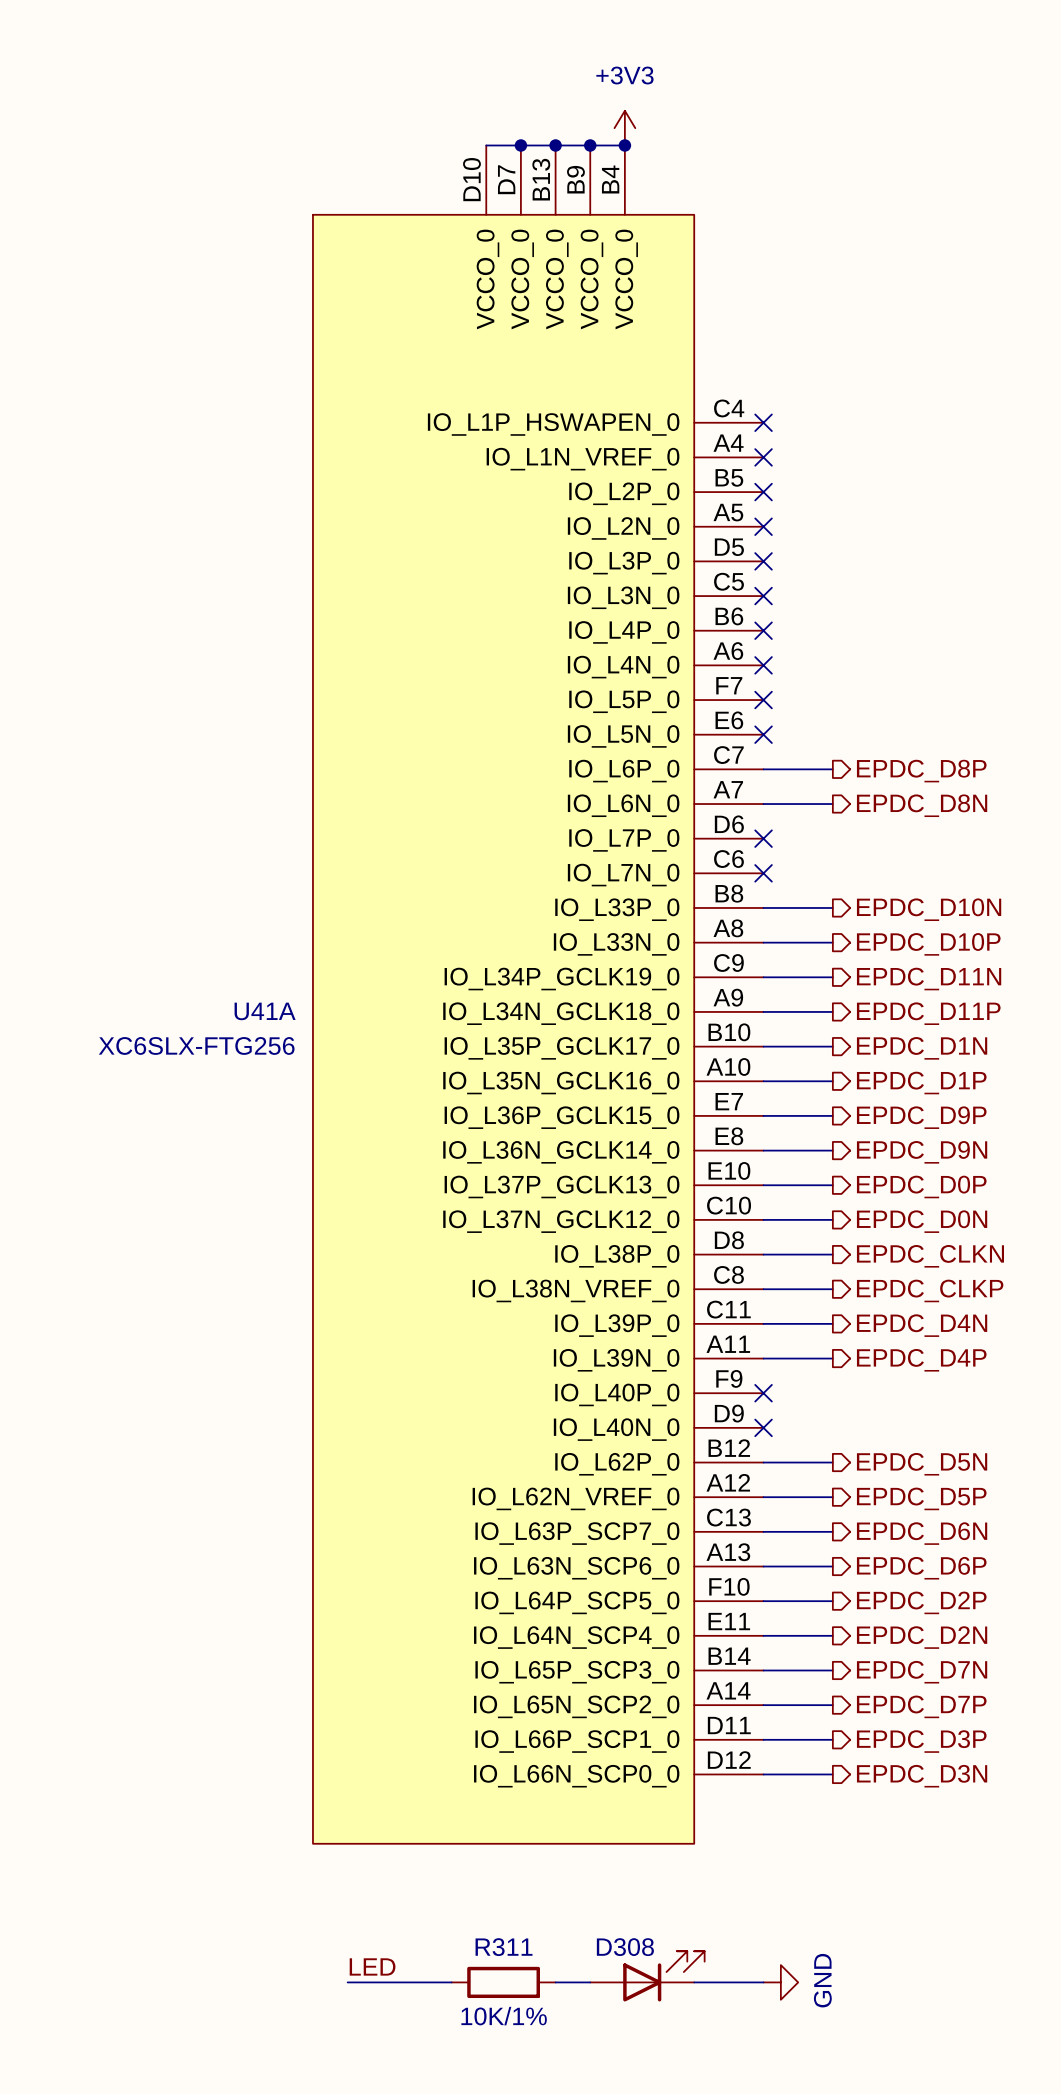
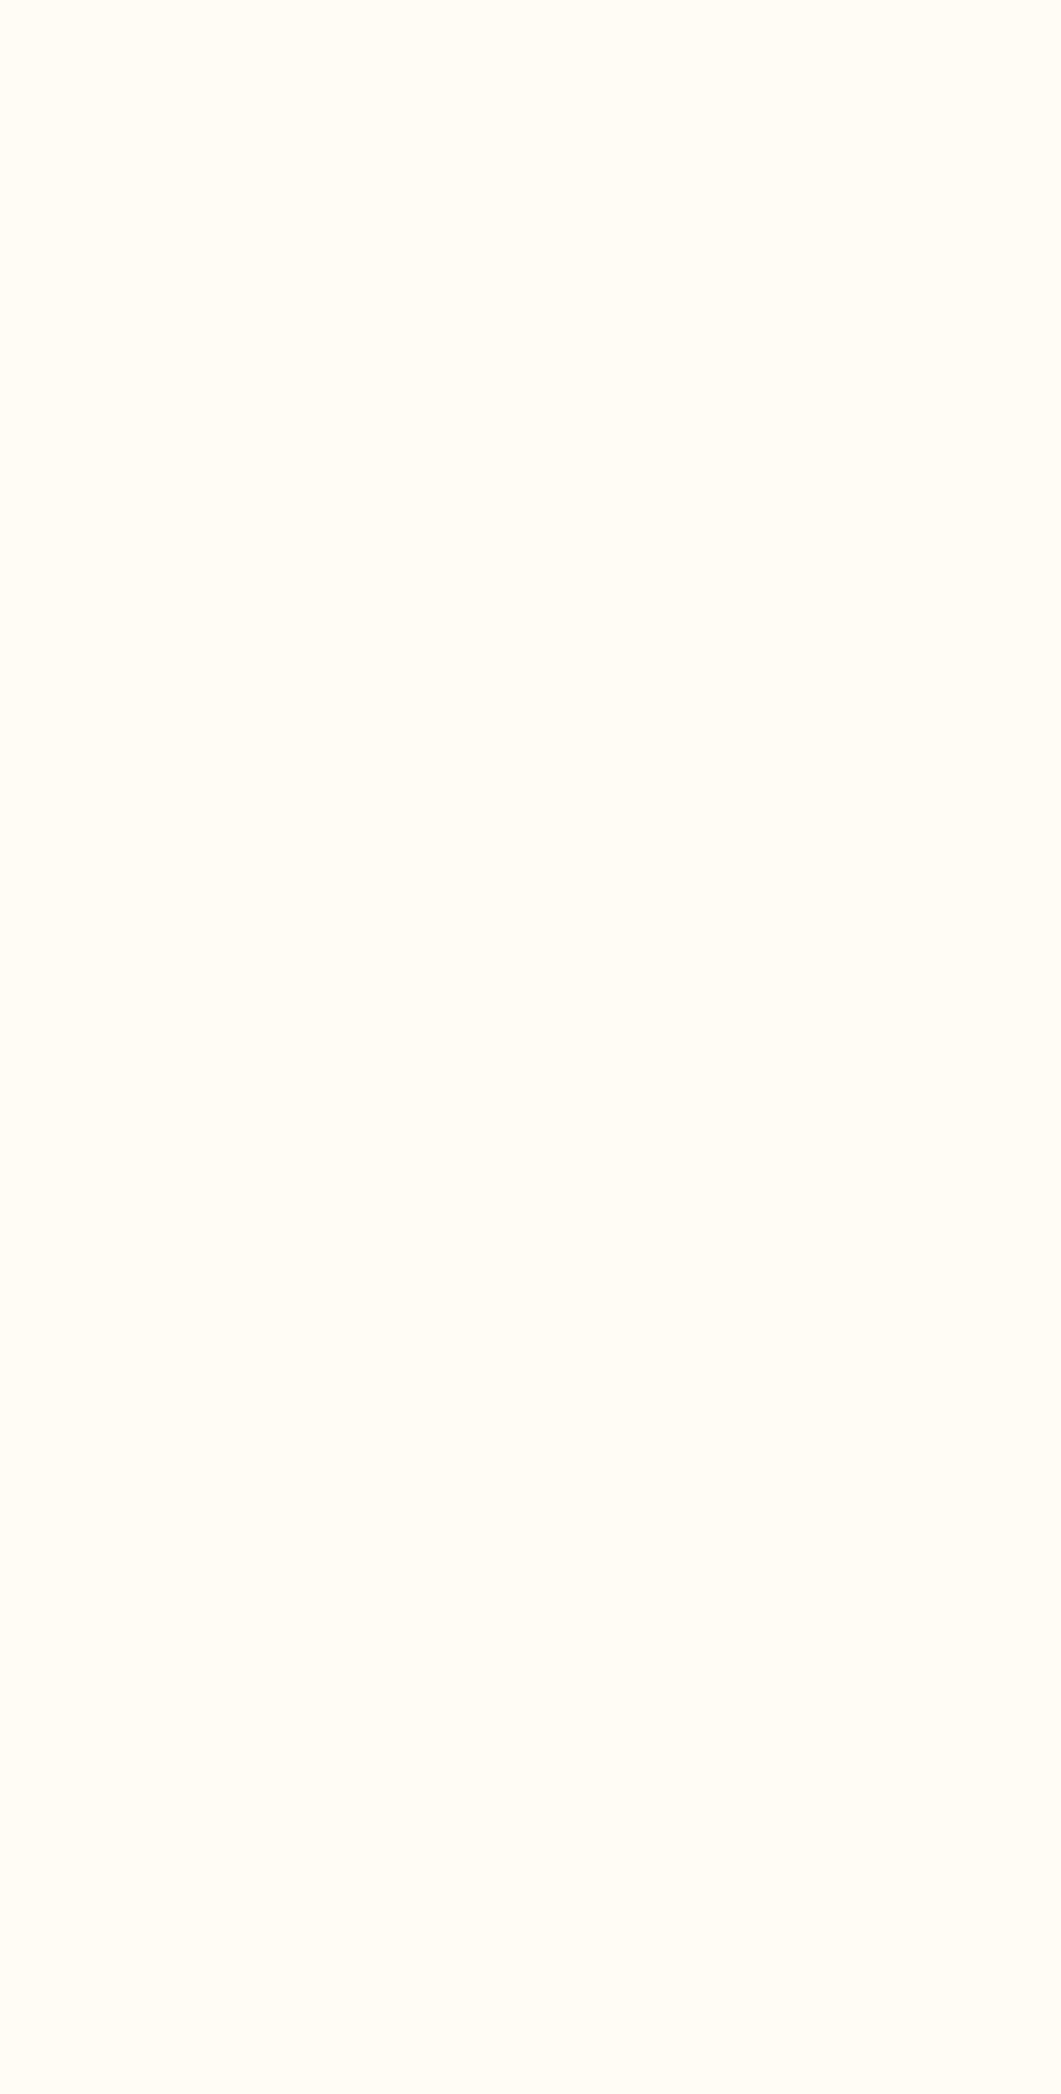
power symbol: +3V3 (624, 128) -> none
wire: (486, 145) (624, 145) -> none
junction: (520, 145) -> none
junction: (555, 145) -> none
junction: (590, 145) -> none
junction: (624, 145) -> none
no-connect mark: (763, 422) -> none
no-connect mark: (763, 457) -> none
no-connect mark: (763, 492) -> none
no-connect mark: (763, 526) -> none
no-connect mark: (763, 561) -> none
no-connect mark: (763, 596) -> none
no-connect mark: (763, 630) -> none
no-connect mark: (763, 665) -> none
no-connect mark: (763, 700) -> none
no-connect mark: (763, 734) -> none
wire: (763, 769) (832, 769) -> none
hierarchical label: EPDC_D8P (921, 771) -> none
wire: (763, 804) (832, 804) -> none
hierarchical label: EPDC_D8N (922, 805) -> none
no-connect mark: (763, 838) -> none
no-connect mark: (763, 873) -> none
wire: (763, 907) (832, 907) -> none
hierarchical label: EPDC_D10N (929, 909) -> none
wire: (763, 942) (832, 942) -> none
hierarchical label: EPDC_D10P (928, 944) -> none
wire: (763, 977) (832, 977) -> none
hierarchical label: EPDC_D11N (929, 979) -> none
U41A: XC6SLX-FTG256 (538, 994) -> none
wire: (763, 1011) (832, 1011) -> none
hierarchical label: EPDC_D11P (928, 1013) -> none
wire: (763, 1046) (832, 1046) -> none
hierarchical label: EPDC_D1N (922, 1048) -> none
wire: (763, 1081) (832, 1081) -> none
hierarchical label: EPDC_D1P (921, 1083) -> none
wire: (763, 1115) (832, 1115) -> none
hierarchical label: EPDC_D9P (921, 1117) -> none
wire: (763, 1150) (832, 1150) -> none
hierarchical label: EPDC_D9N (922, 1152) -> none
wire: (763, 1185) (832, 1185) -> none
hierarchical label: EPDC_D0P (921, 1186) -> none
wire: (763, 1219) (832, 1219) -> none
hierarchical label: EPDC_D0N (922, 1221) -> none
wire: (763, 1254) (832, 1254) -> none
hierarchical label: EPDC_CLKN (930, 1256) -> none
wire: (763, 1289) (832, 1289) -> none
hierarchical label: EPDC_CLKP (930, 1290) -> none
wire: (763, 1323) (832, 1323) -> none
hierarchical label: EPDC_D4N (922, 1325) -> none
wire: (763, 1358) (832, 1358) -> none
hierarchical label: EPDC_D4P (921, 1360) -> none
no-connect mark: (763, 1393) -> none
no-connect mark: (763, 1427) -> none
wire: (763, 1462) (832, 1462) -> none
hierarchical label: EPDC_D5N (922, 1464) -> none
wire: (763, 1497) (832, 1497) -> none
hierarchical label: EPDC_D5P (921, 1498) -> none
wire: (763, 1531) (832, 1531) -> none
hierarchical label: EPDC_D6N (922, 1533) -> none
wire: (763, 1566) (832, 1566) -> none
hierarchical label: EPDC_D6P (921, 1568) -> none
wire: (763, 1601) (832, 1601) -> none
hierarchical label: EPDC_D2P (921, 1602) -> none
wire: (763, 1635) (832, 1635) -> none
hierarchical label: EPDC_D2N (922, 1637) -> none
wire: (763, 1670) (832, 1670) -> none
hierarchical label: EPDC_D7N (922, 1672) -> none
wire: (763, 1705) (832, 1705) -> none
hierarchical label: EPDC_D7P (921, 1706) -> none
wire: (763, 1739) (832, 1739) -> none
hierarchical label: EPDC_D3P (921, 1741) -> none
wire: (763, 1774) (832, 1774) -> none
hierarchical label: EPDC_D3N (922, 1776) -> none
label: LED (372, 1966) -> none
D308: (647, 1976) -> none
wire: (347, 1982) (451, 1982) -> none
R311: 10K/1% (503, 1982) -> none
wire: (555, 1982) (590, 1982) -> none
wire: (694, 1982) (763, 1982) -> none
power symbol: GND (780, 1982) -> none

